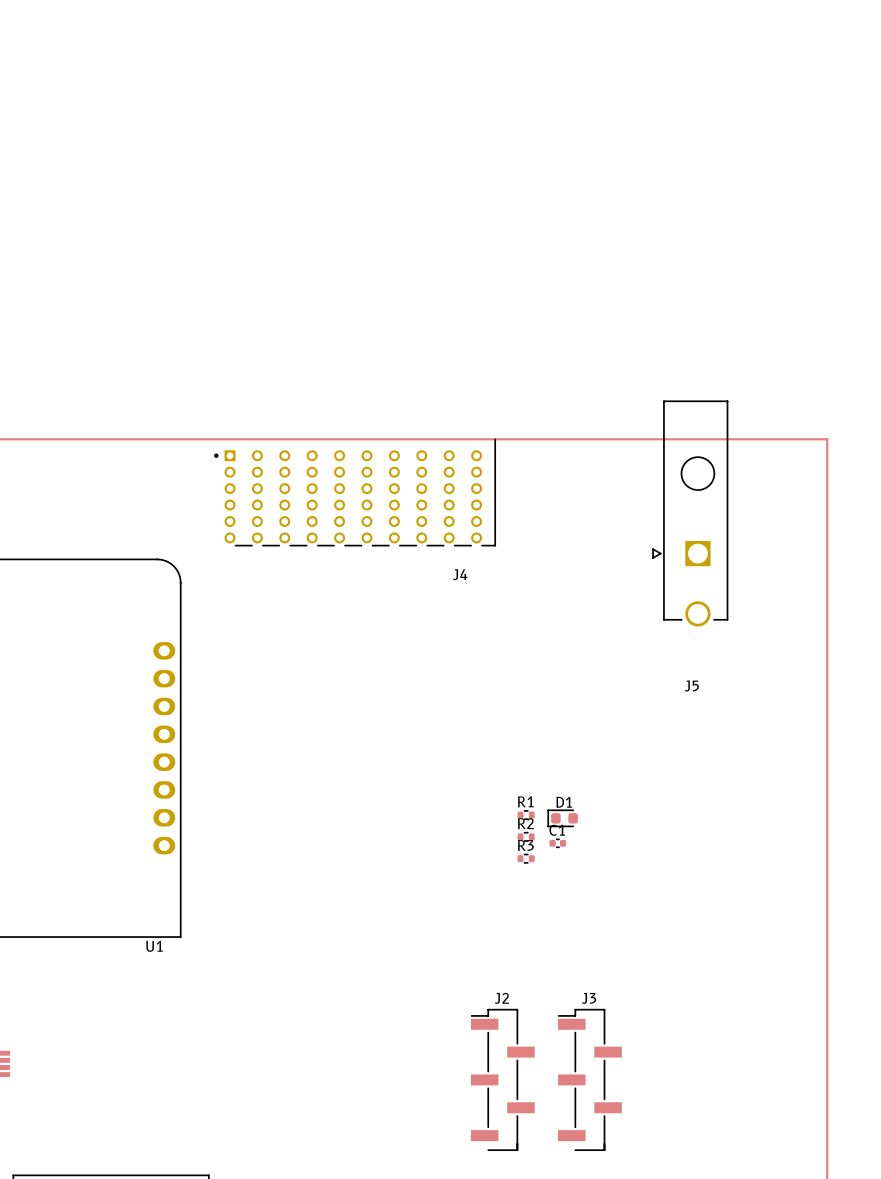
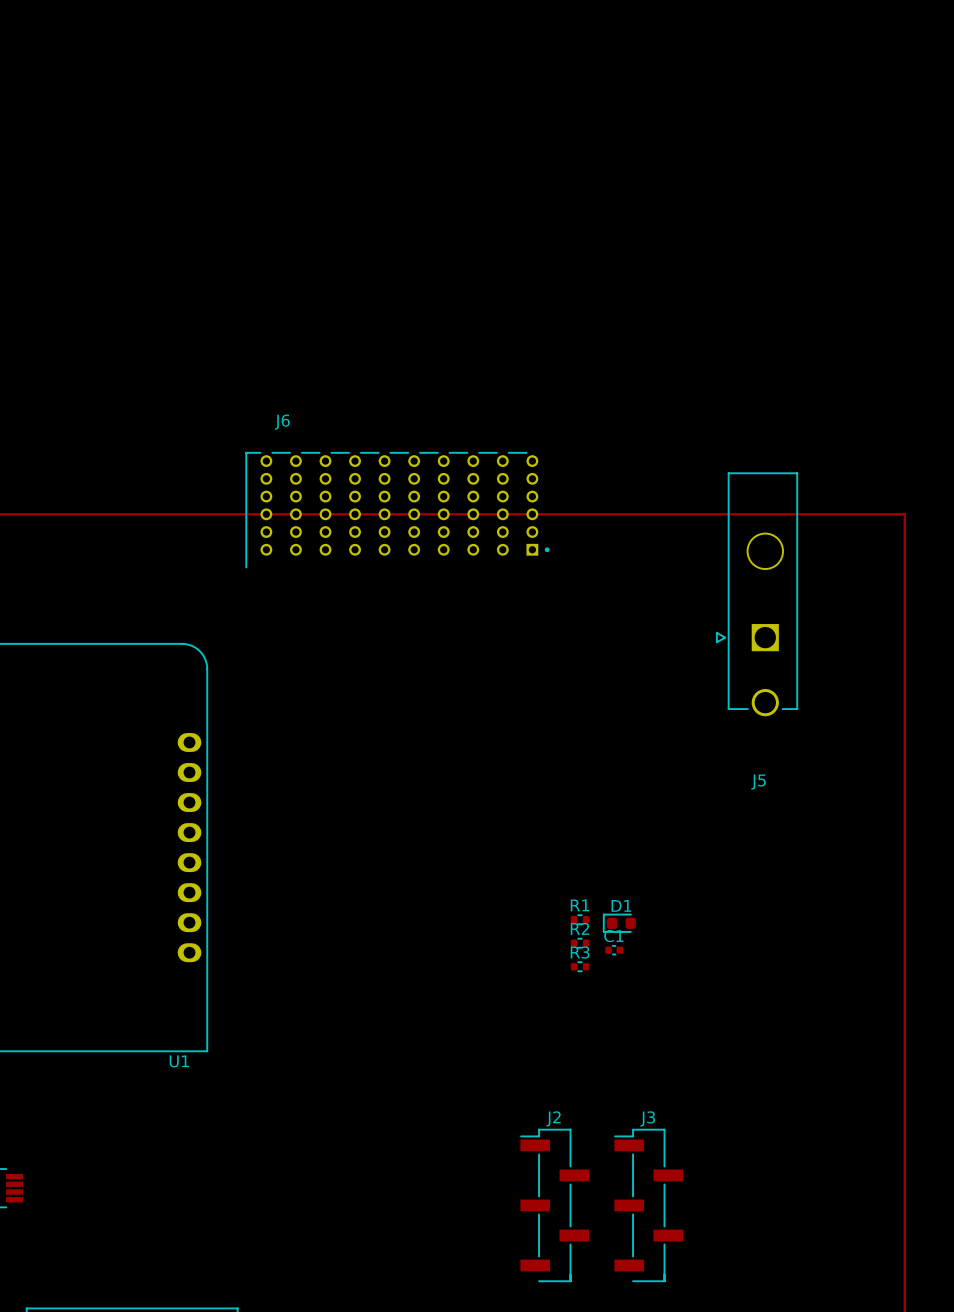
J6: none -> (397, 510)
J4: (355, 492) -> none

